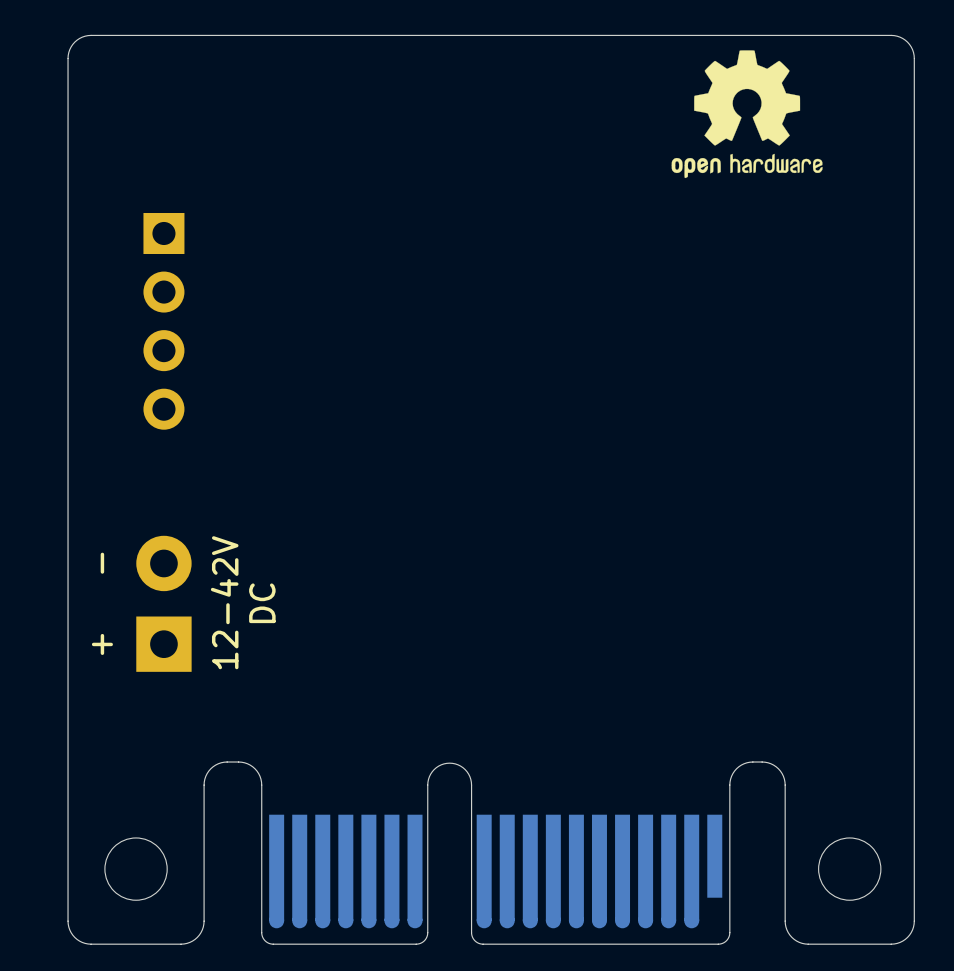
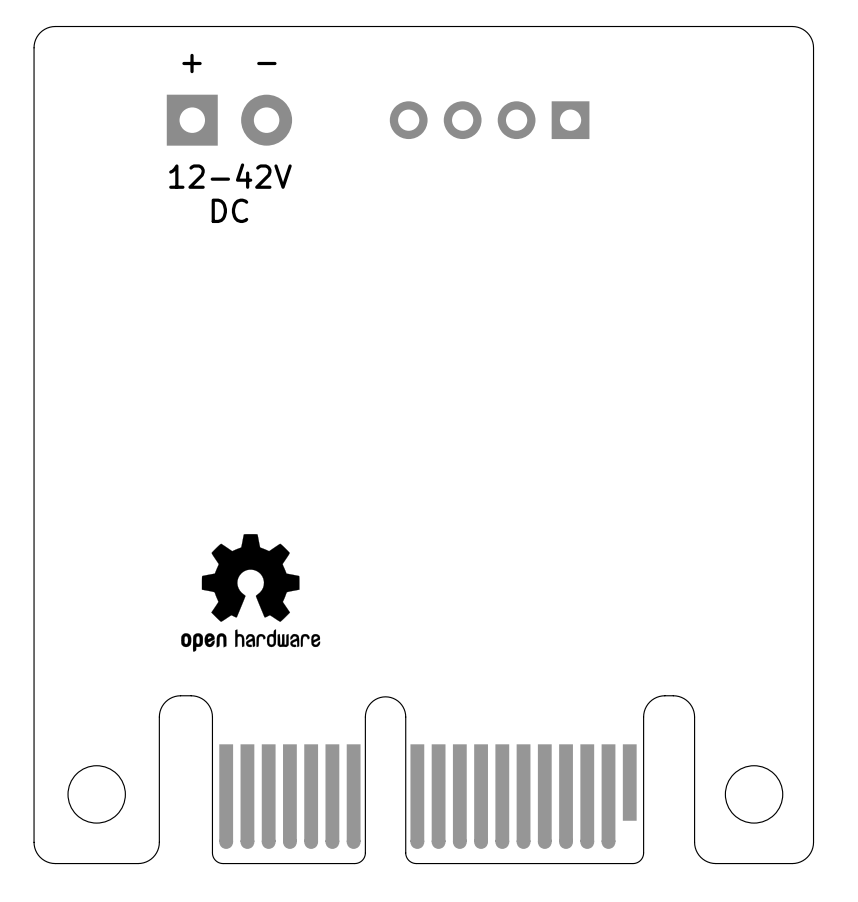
drawing: [671, 50, 823, 179] -> none
part rotation: 0° (163, 321) -> 90° clockwise (489, 120)
part position: (163, 321) -> (489, 120)
drawing: none -> [181, 534, 321, 652]
text rotation: 0° (224, 602) -> 90° clockwise (230, 176)
text position: 12-42V (224, 602) -> 12-42V (230, 176)
text rotation: 0° (102, 603) -> 90° clockwise (229, 63)
text position: + - (102, 603) -> + - (229, 63)
part rotation: 0° (163, 603) -> 90° clockwise (229, 120)
part position: (163, 603) -> (229, 120)
text rotation: 0° (262, 603) -> 90° clockwise (229, 210)
text position: DC (262, 603) -> DC (229, 210)

